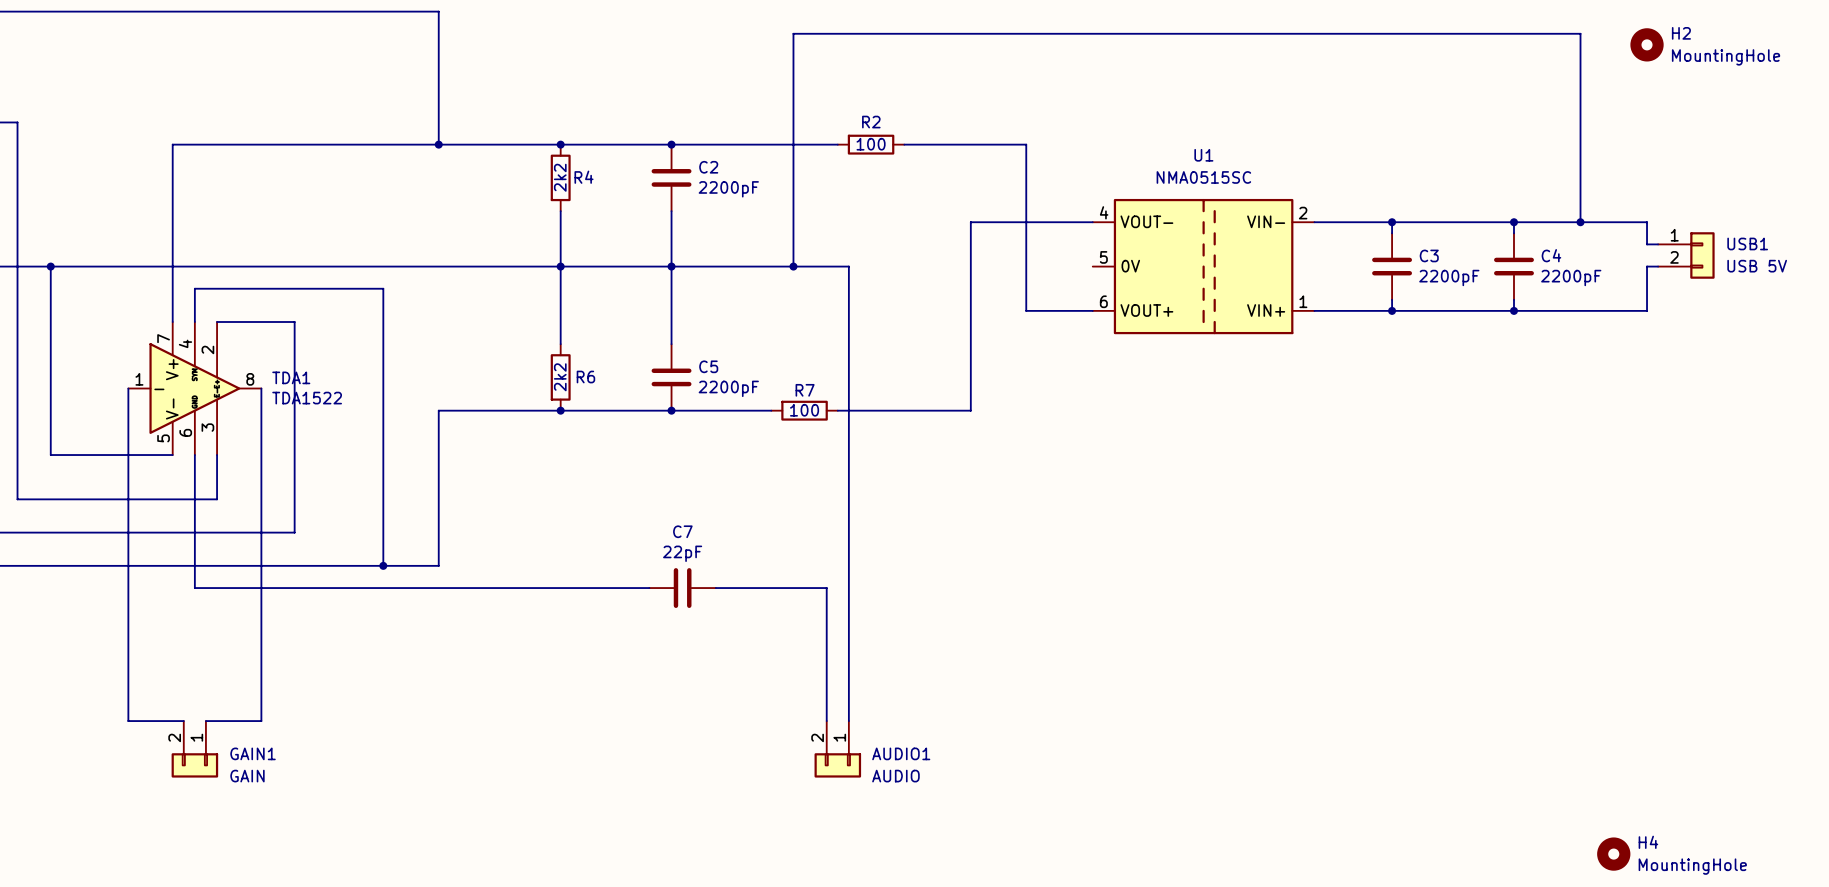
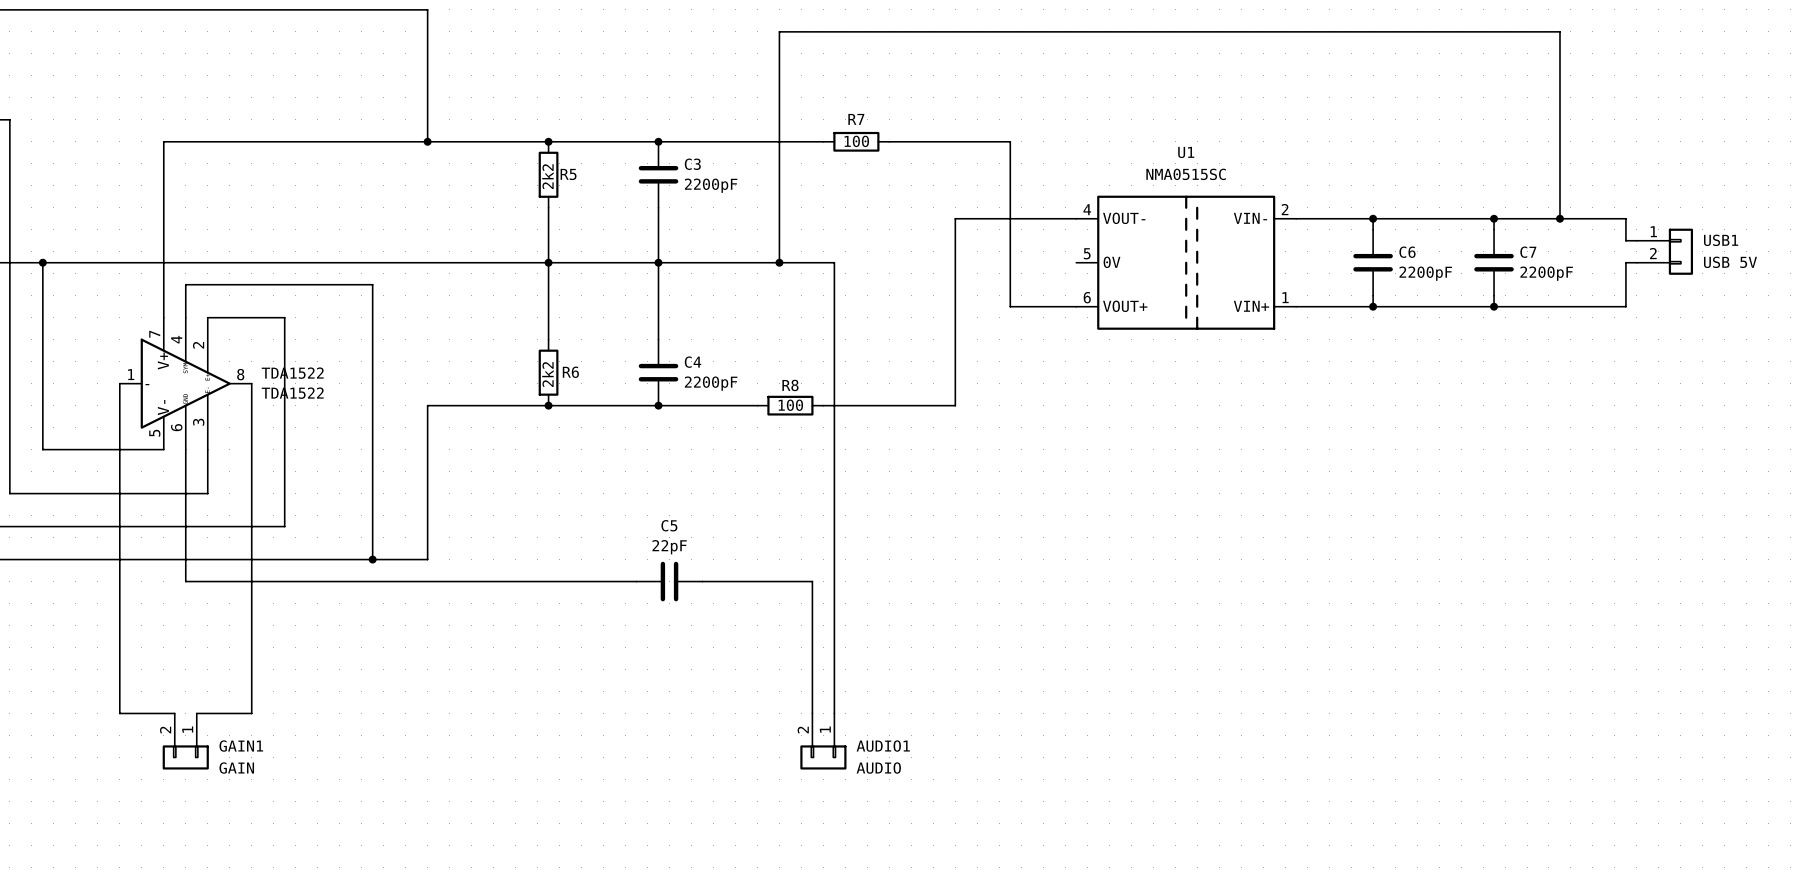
H2: MountingHole (1647, 44) -> none
R2 name: R2 (871, 122) -> R7 (856, 119)
C2 name: C2 (708, 167) -> C3 (692, 164)
R4 name: R4 (583, 177) -> R5 (568, 174)
C3 name: C3 (1429, 255) -> C6 (1407, 252)
C4 name: C4 (1551, 255) -> C7 (1528, 252)
C5 name: C5 (708, 366) -> C4 (693, 362)
TDA1 name: TDA1 (291, 377) -> TDA1522 (292, 373)
R7 name: R7 (805, 390) -> R8 (790, 385)
C7 name: C7 (682, 531) -> C5 (669, 525)
H4: MountingHole (1613, 854) -> none

